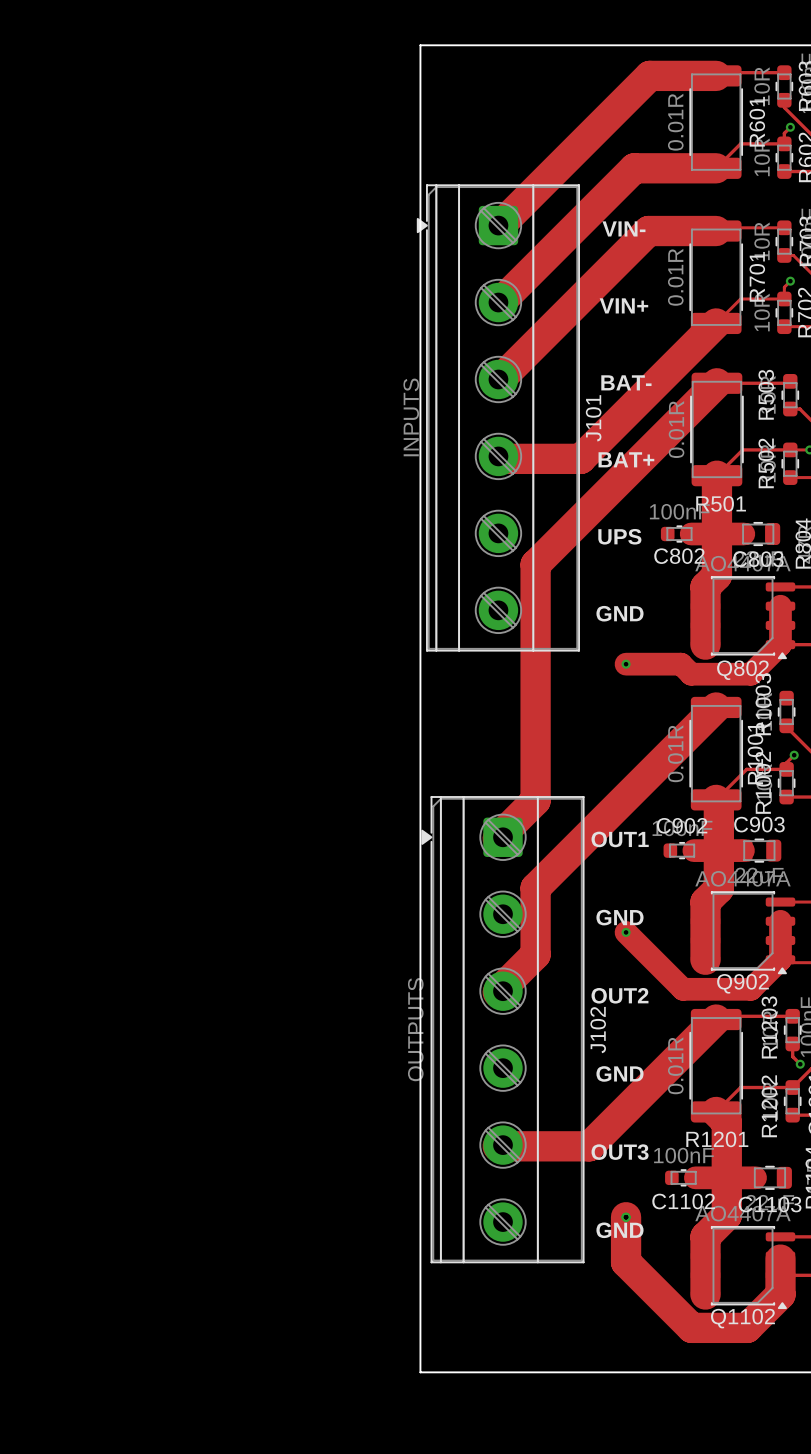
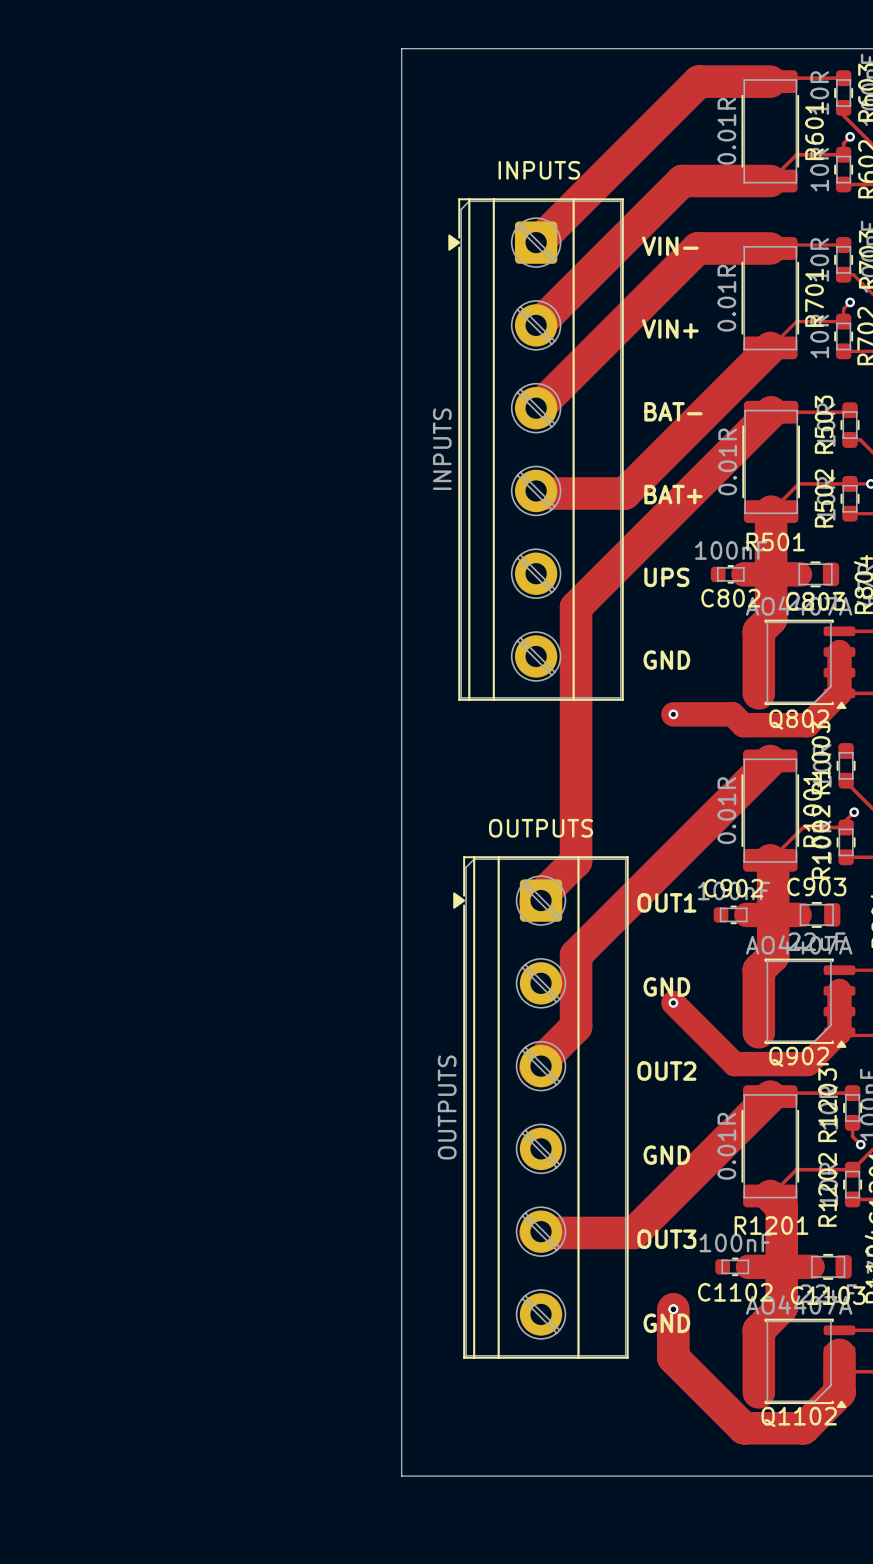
board edge: (420, 45) (420, 1372) -> (452, 48) (401, 48) (401, 1476) (452, 1476)
J101 name: J101 (593, 418) -> INPUTS (539, 170)
J102 name: J102 (598, 1030) -> OUTPUTS (541, 828)

